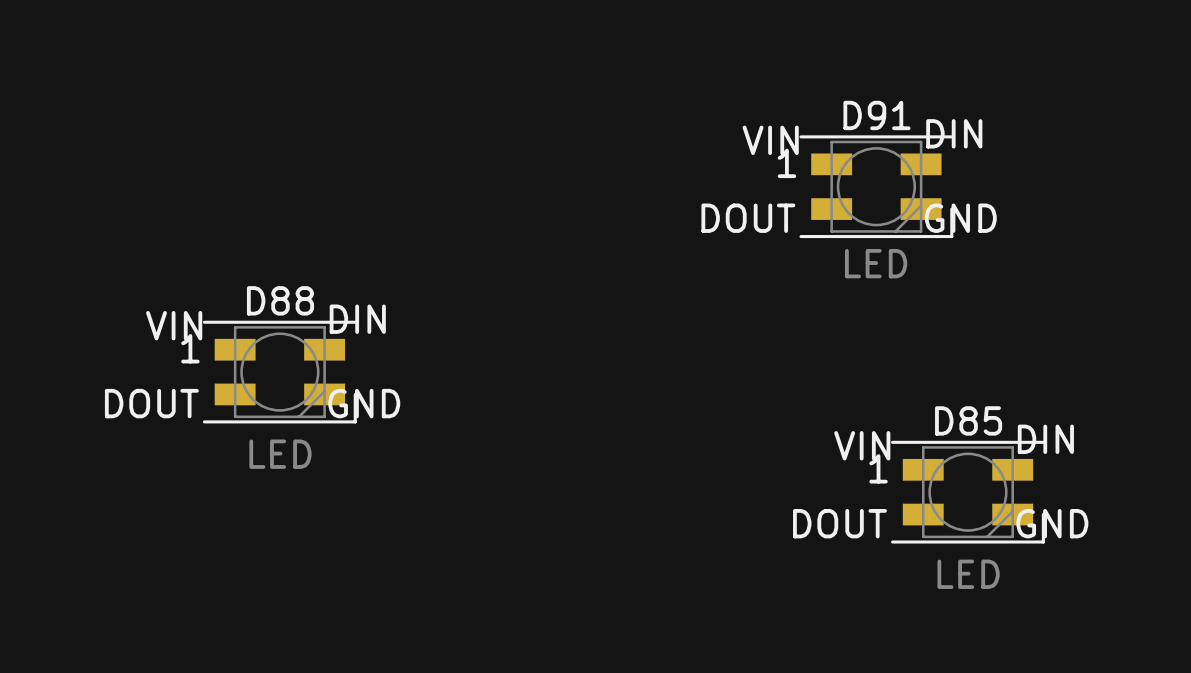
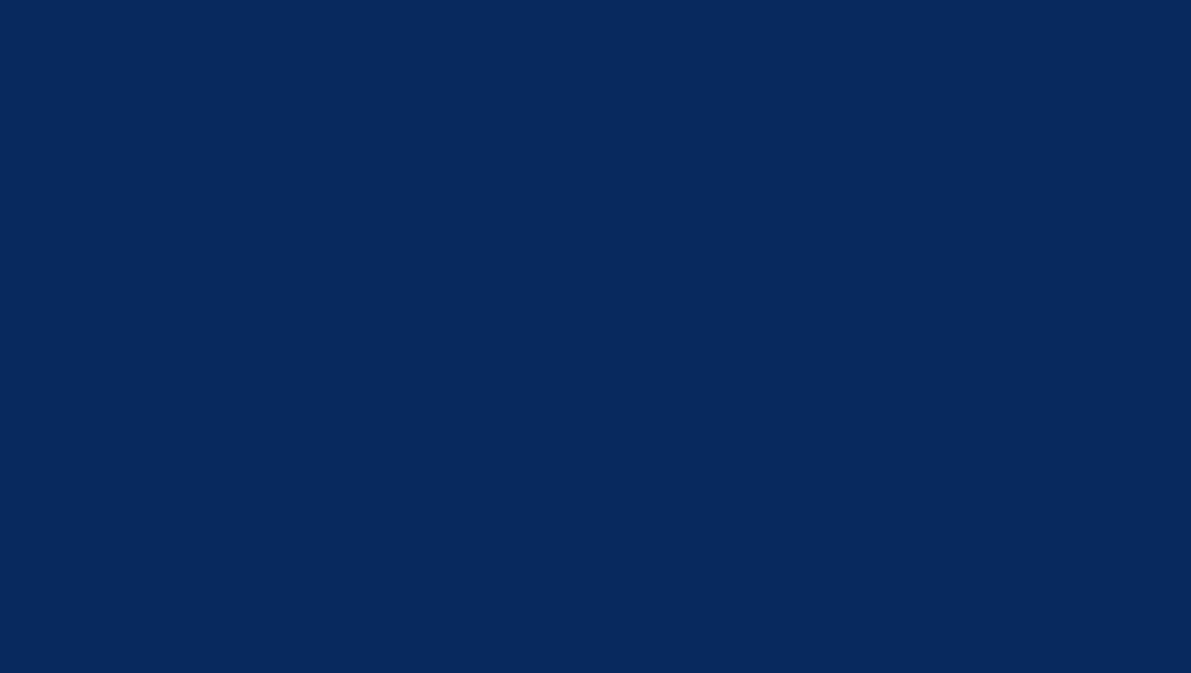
D91: LED (876, 186) -> none
D88: LED (279, 372) -> none
D85: LED (967, 492) -> none

